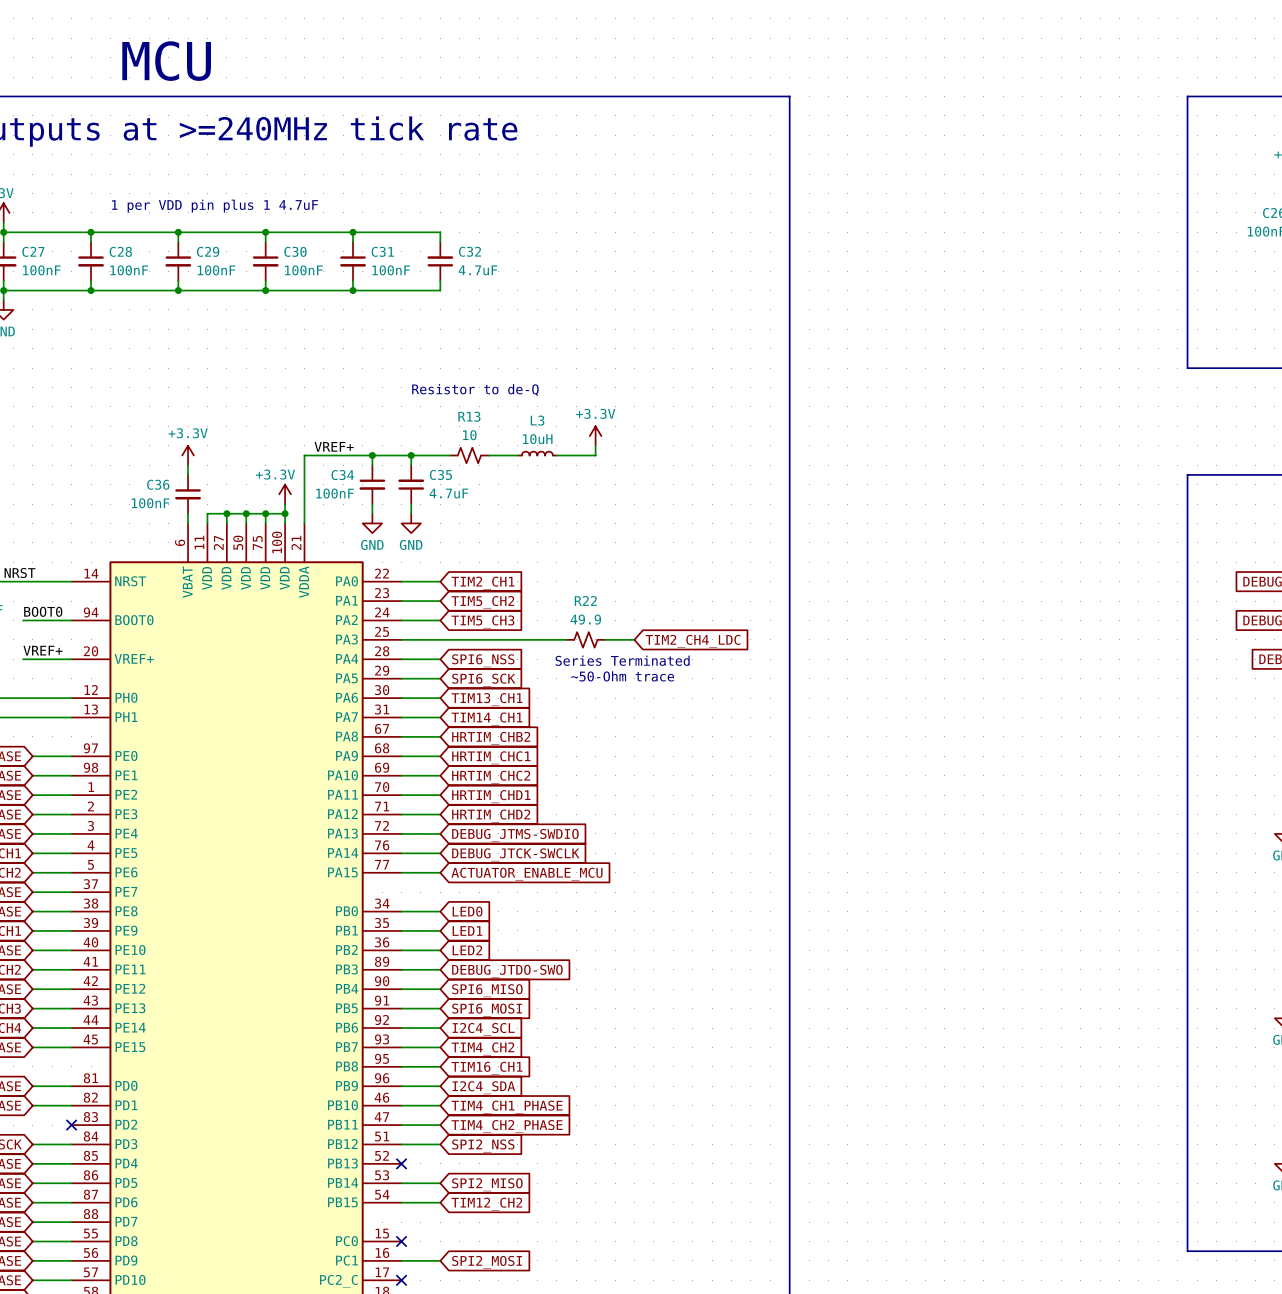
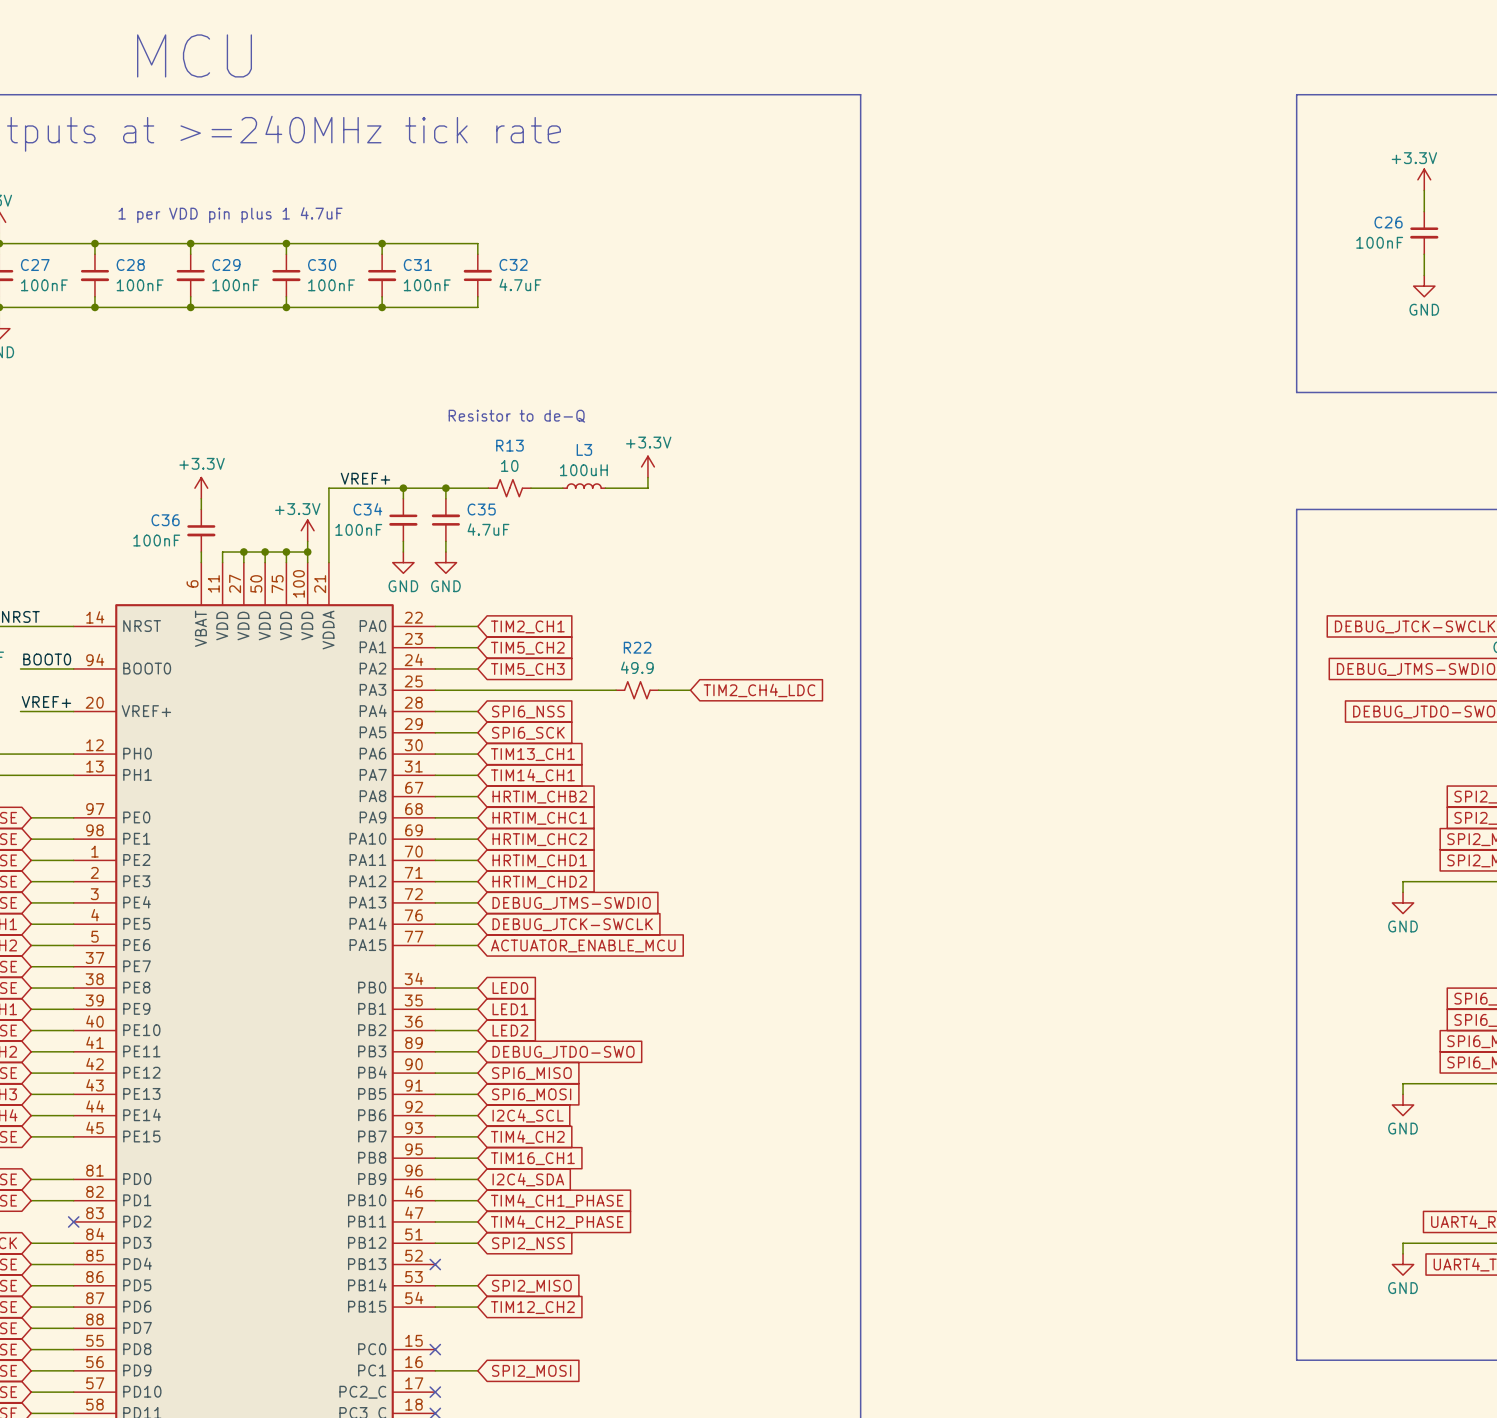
L3 value: 10uH (537, 439) -> 100uH (583, 470)
text: Series Terminated (622, 660) -> none
text: ~50-Ohm trace (622, 676) -> none

